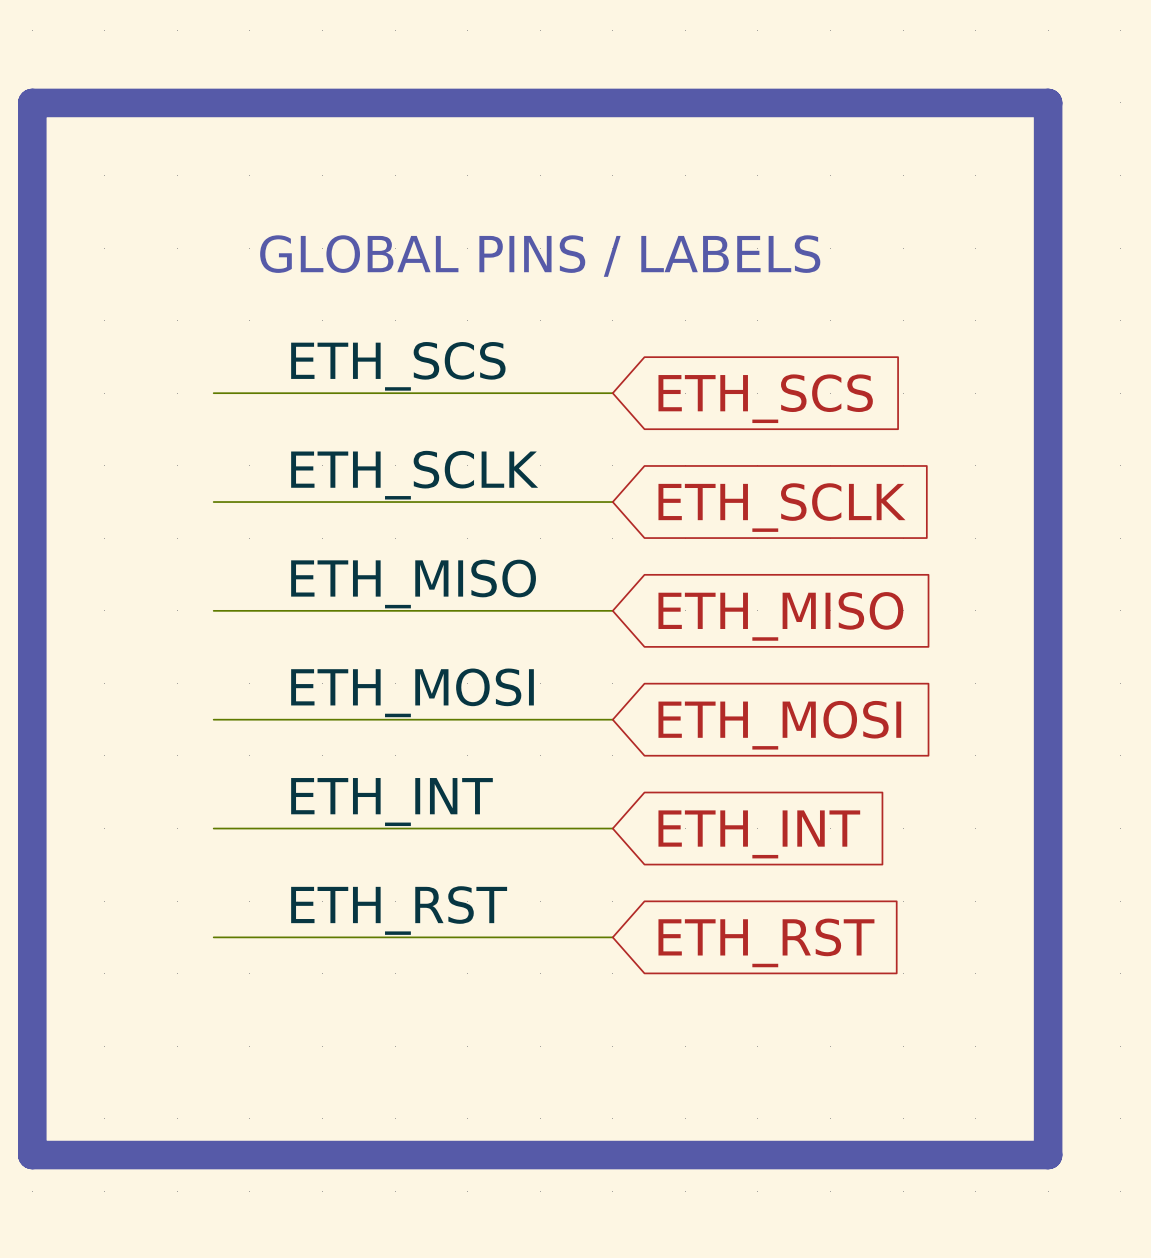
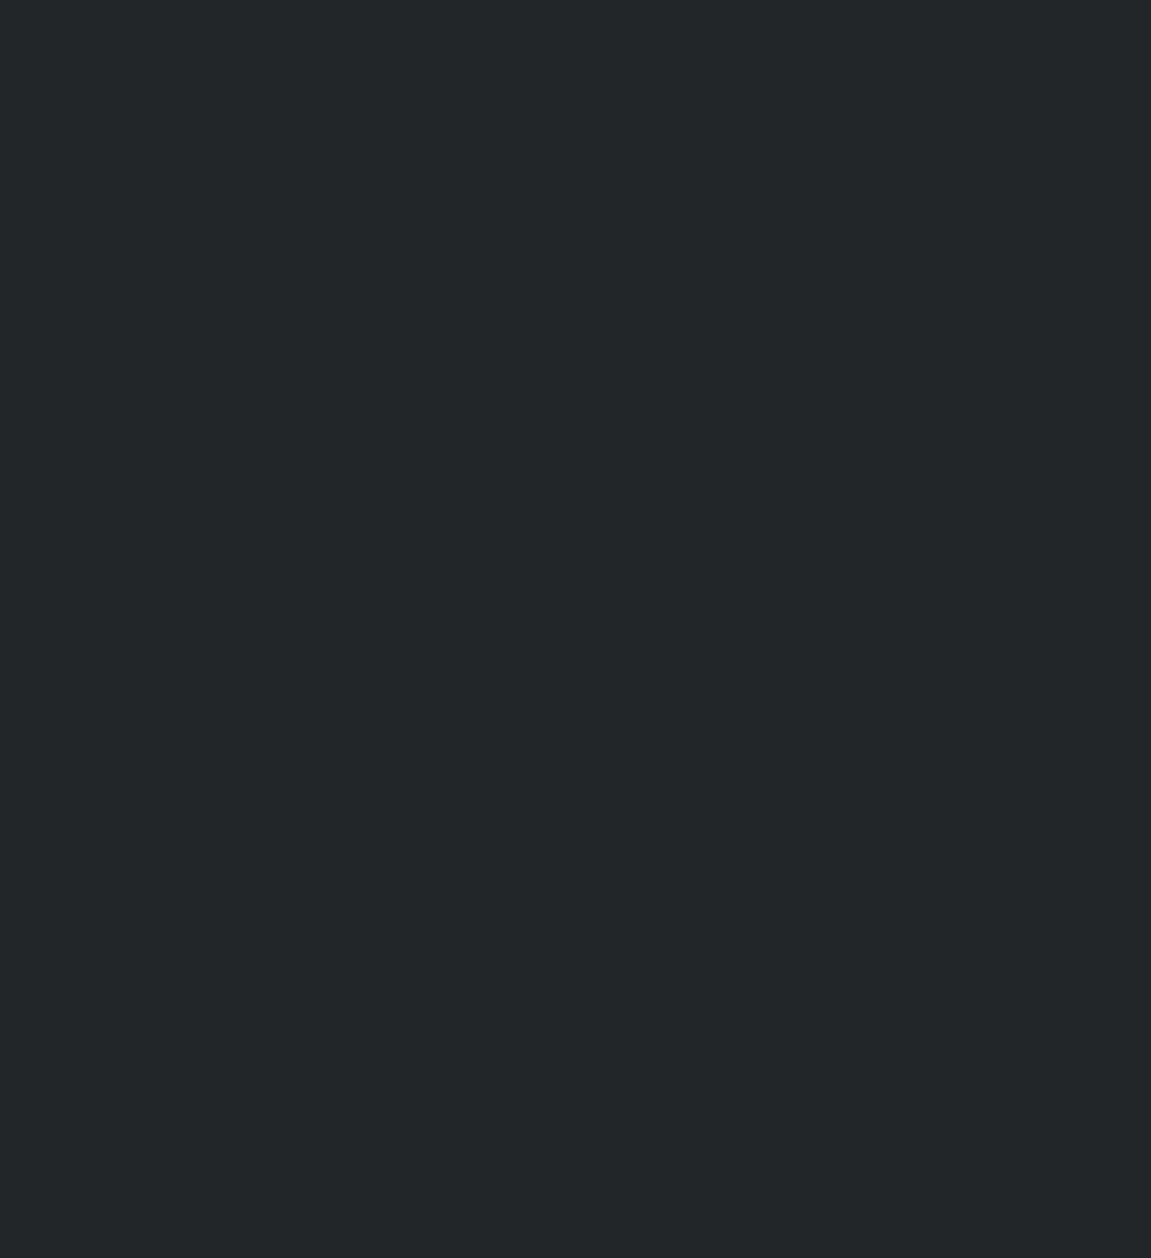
line: (32, 102) (1048, 102) (1048, 1155) (32, 1155) (32, 102) -> none
text: GLOBAL PINS / LABELS (540, 256) -> none
label: ETH_SCS (398, 366) -> none
wire: (213, 393) (612, 393) -> none
global label: ETH_SCS (765, 398) -> none
label: ETH_SCLK (414, 475) -> none
wire: (213, 502) (612, 502) -> none
global label: ETH_SCLK (781, 507) -> none
label: ETH_MISO (413, 584) -> none
wire: (213, 610) (612, 610) -> none
global label: ETH_MISO (780, 616) -> none
label: ETH_MOSI (412, 692) -> none
wire: (213, 719) (612, 719) -> none
global label: ETH_MOSI (779, 725) -> none
label: ETH_INT (391, 802) -> none
wire: (213, 828) (612, 828) -> none
global label: ETH_INT (759, 834) -> none
label: ETH_RST (399, 910) -> none
wire: (213, 937) (612, 937) -> none
global label: ETH_RST (766, 942) -> none

